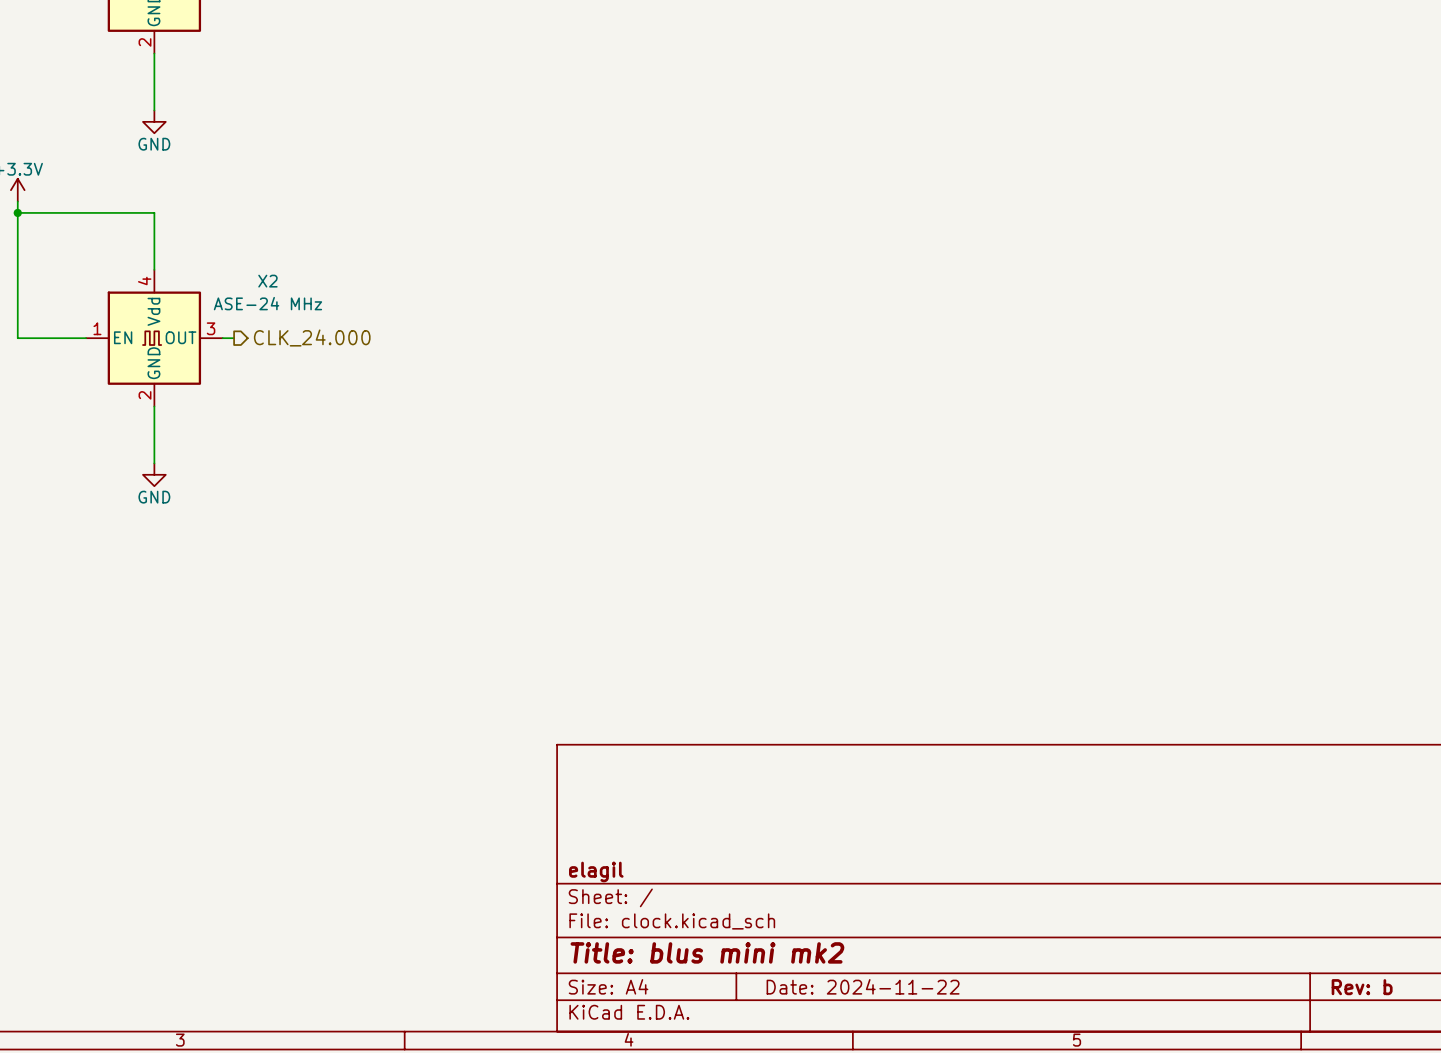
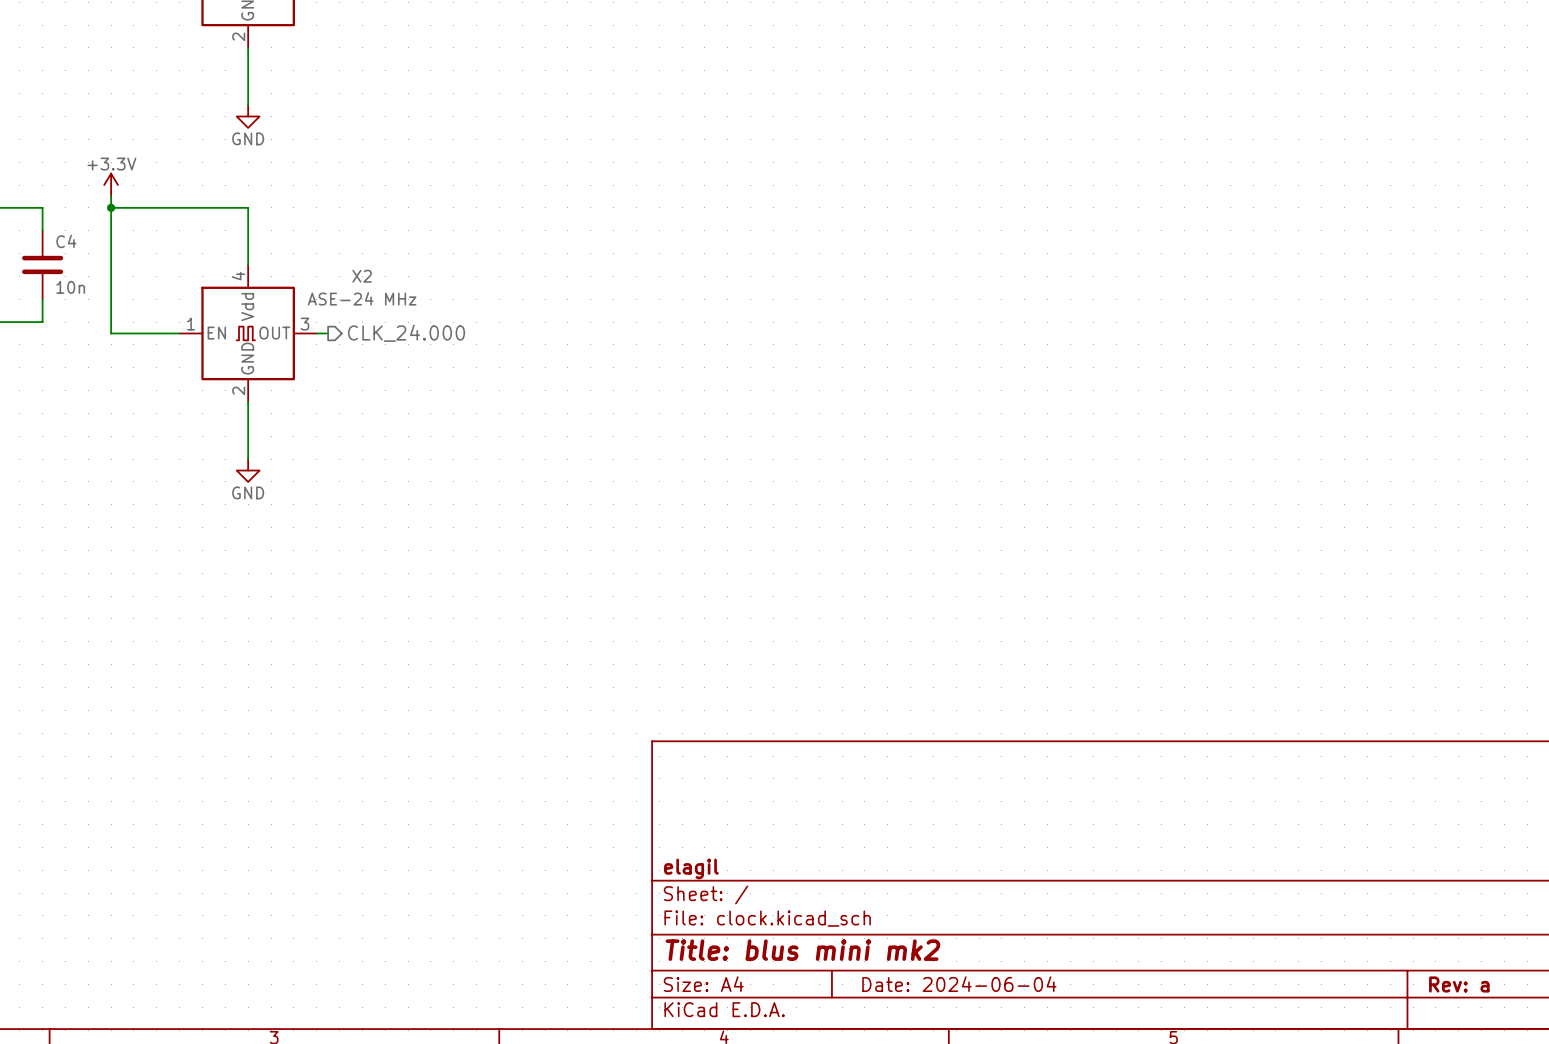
title block: Date: 2024-11-22 (863, 986) -> Date: 2024-06-04 (959, 984)
title block: Rev: b (1362, 987) -> Rev: a (1459, 984)

